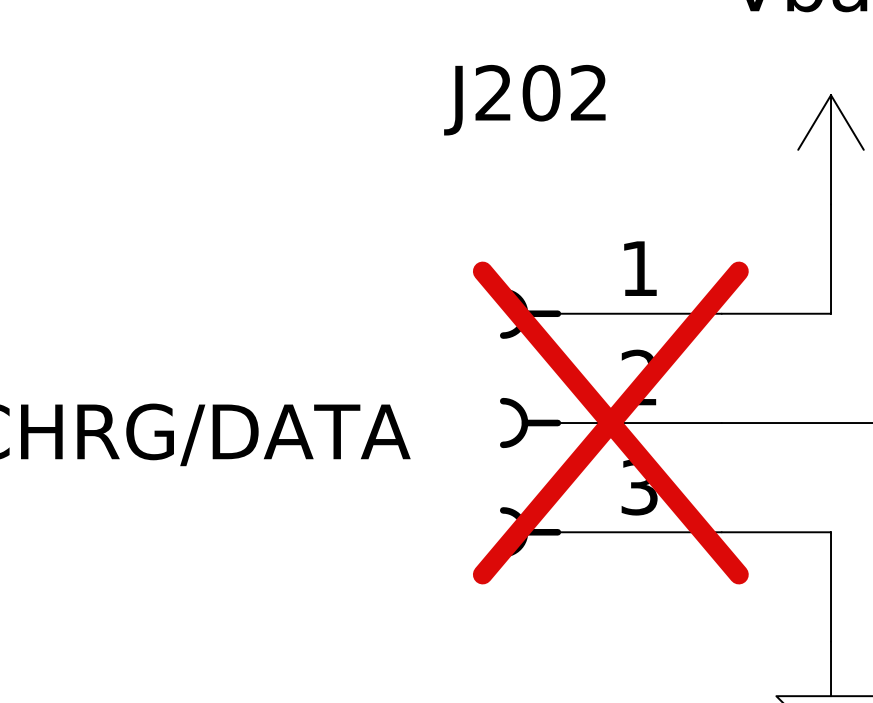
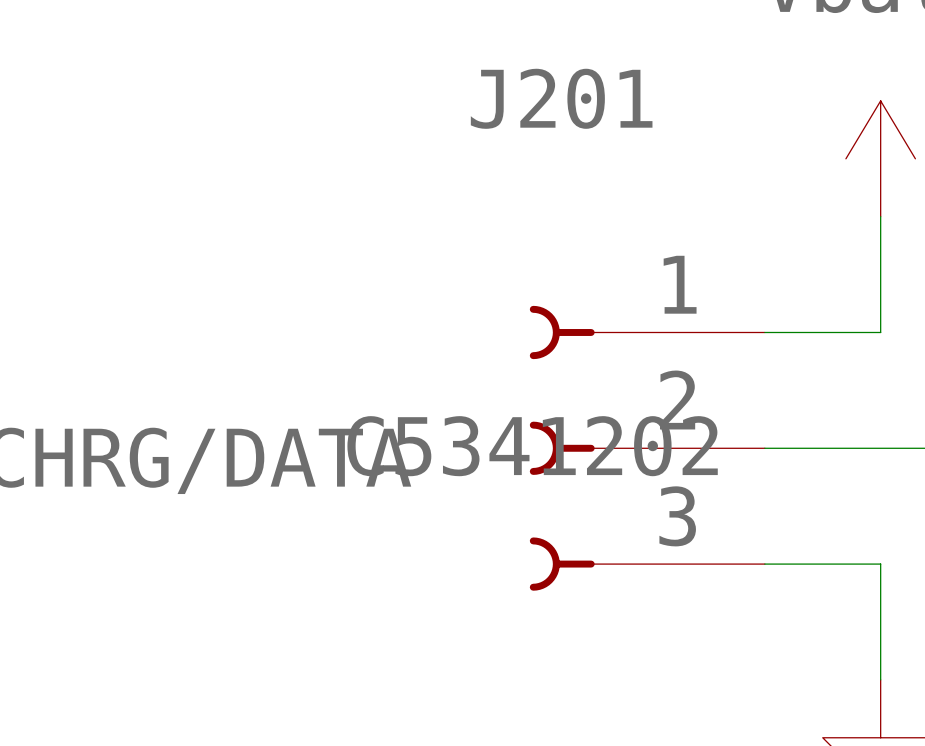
J202 name: J202 (524, 100) -> J201 (561, 98)
J202 text: none -> C5341202 (532, 446)
J202 do-not-place cross: (610, 423) -> none

